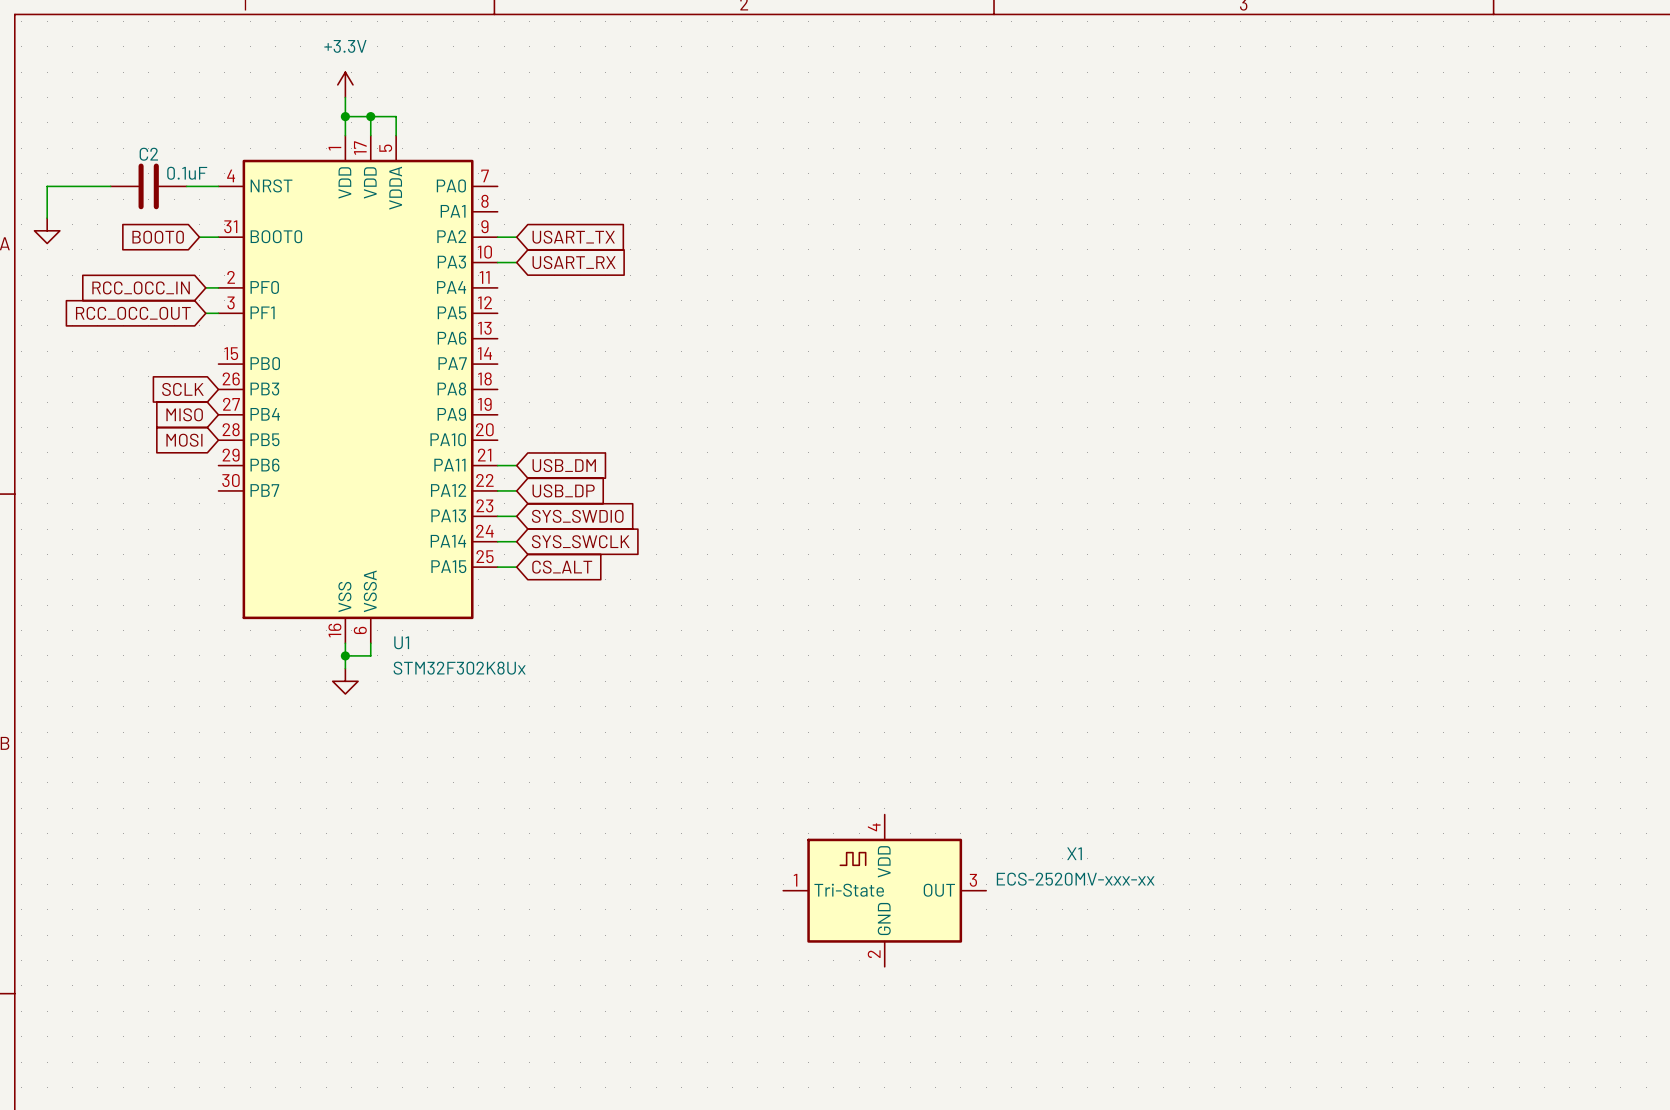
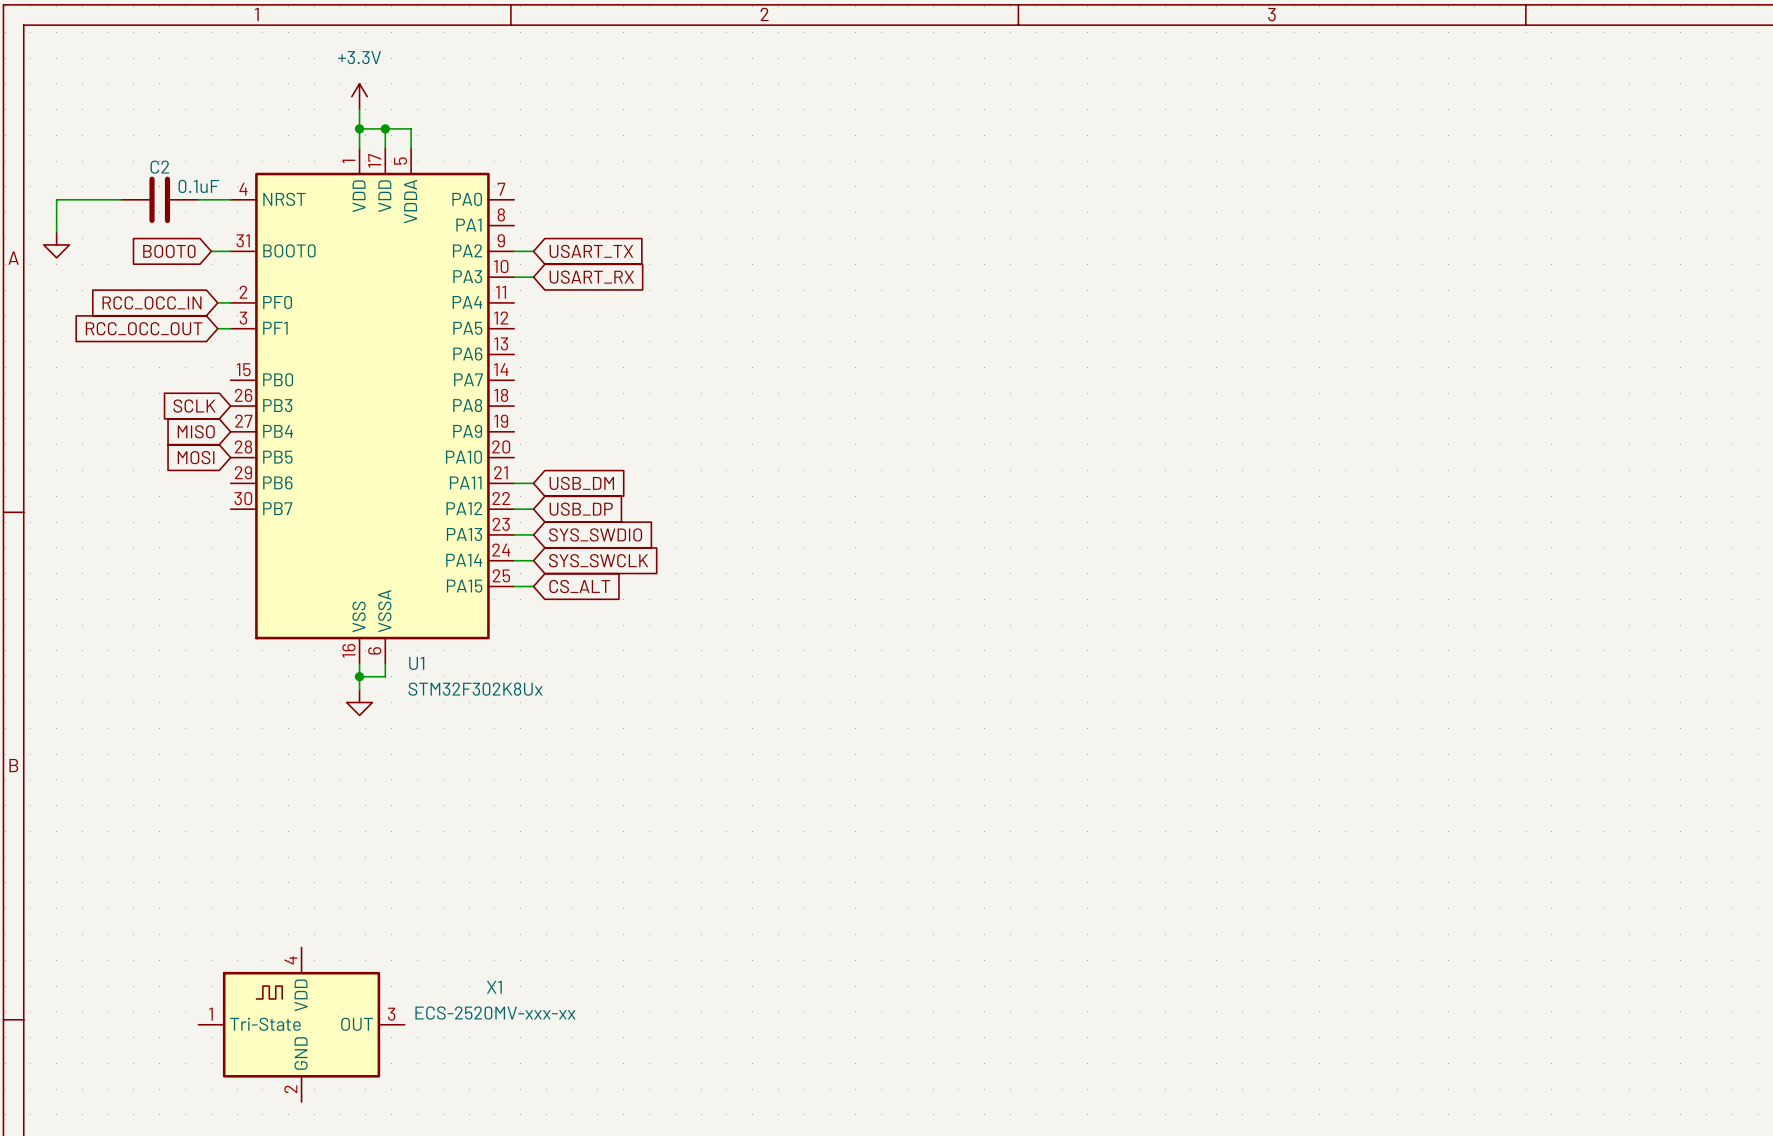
X1 position: (884, 890) -> (301, 1024)

